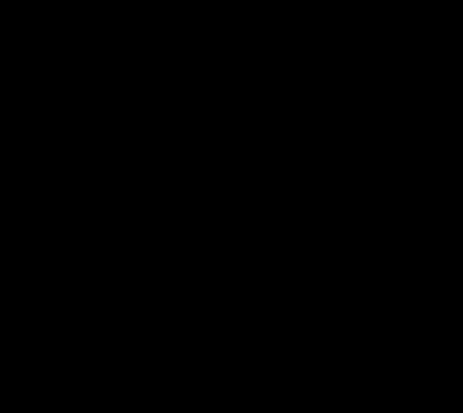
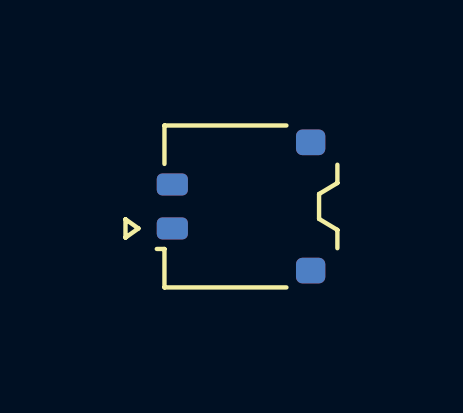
part: none -> (231, 206)

